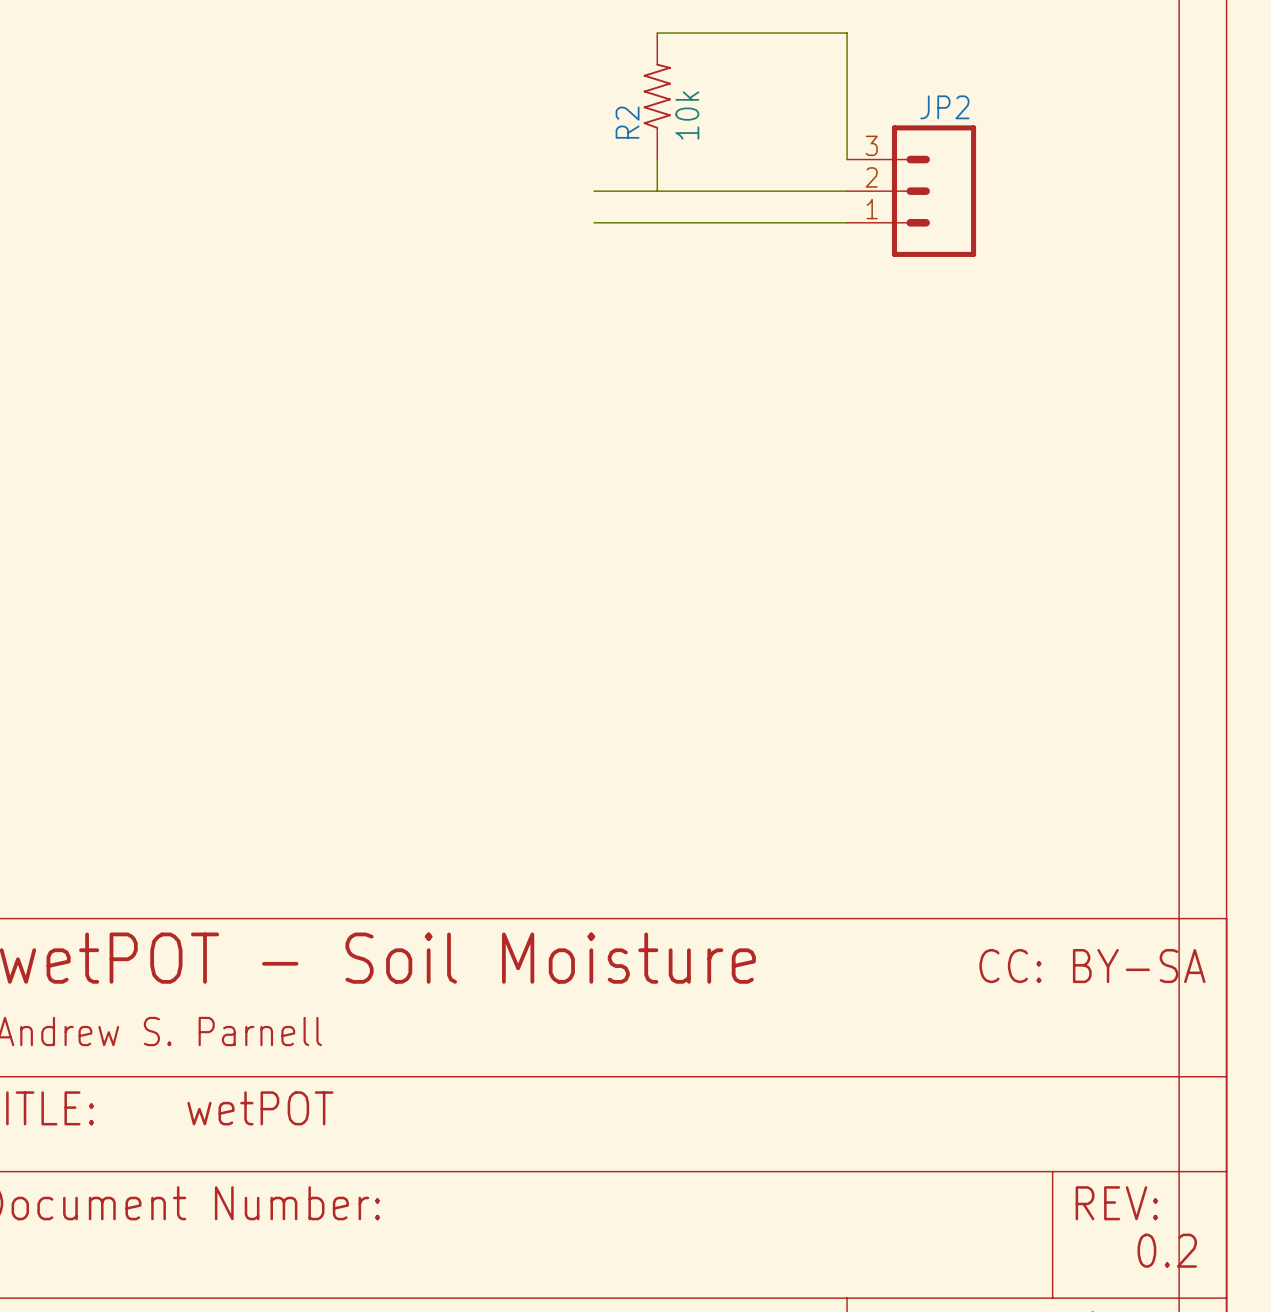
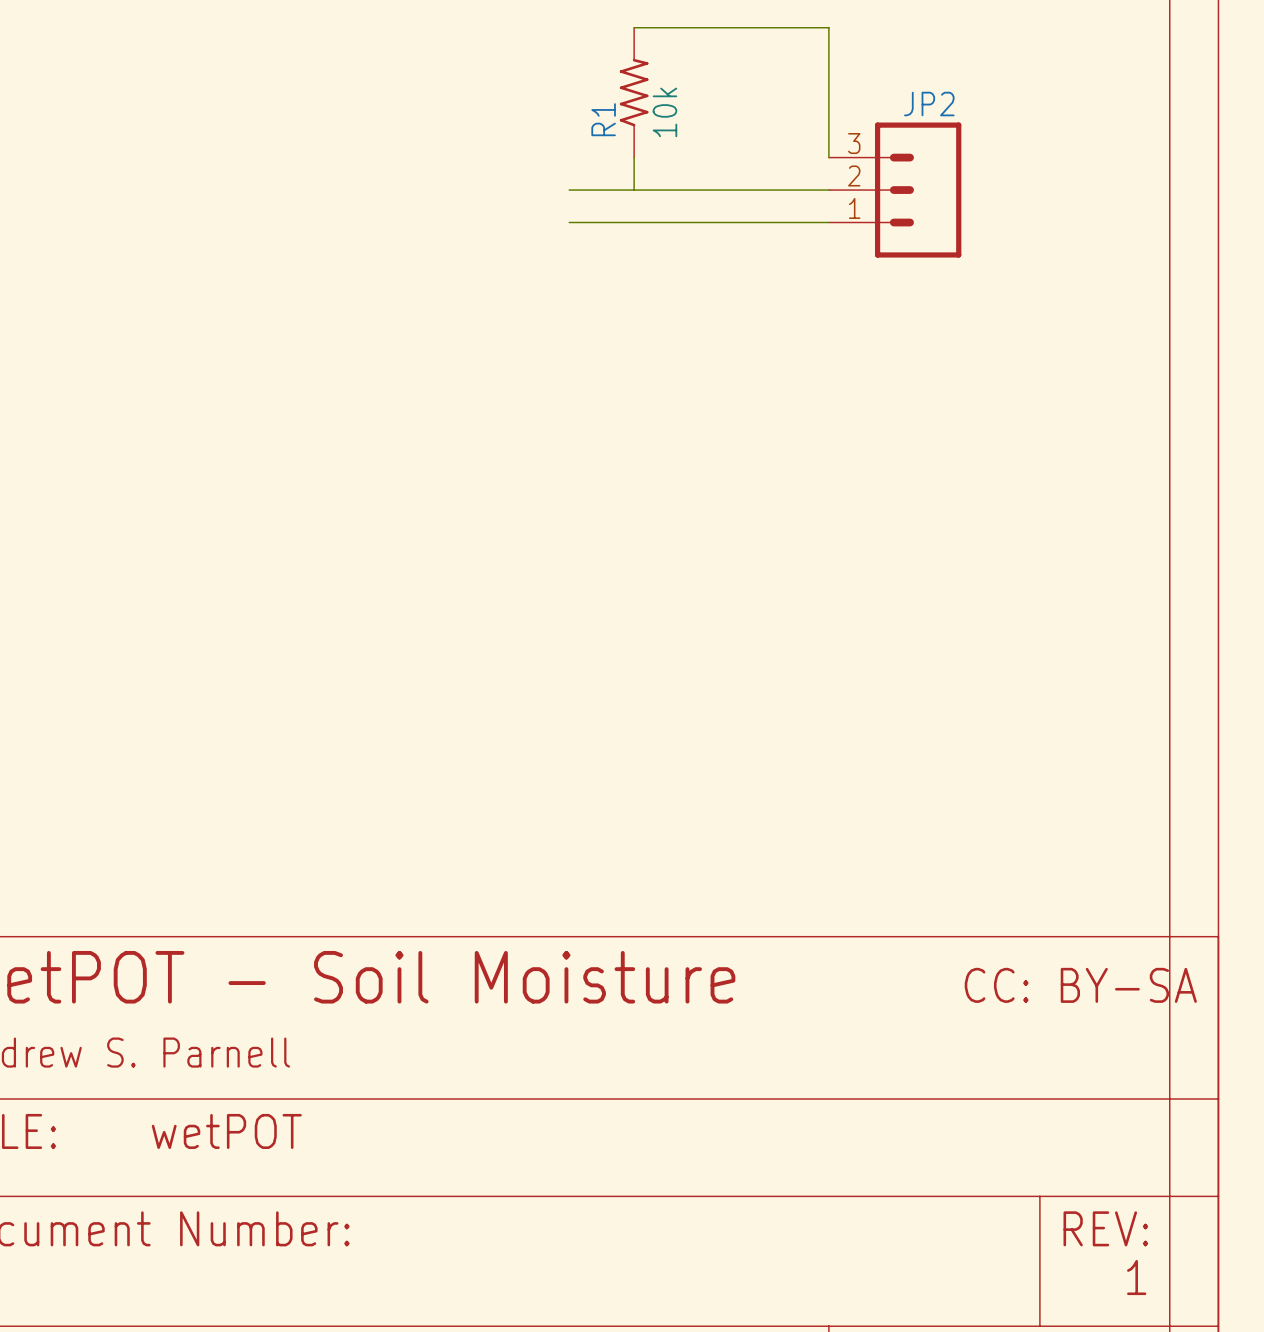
R2: 10k (657, 96) -> none
R1: none -> 10k (634, 92)
text: 0.2 (1167, 1250) -> 1 (1136, 1277)

